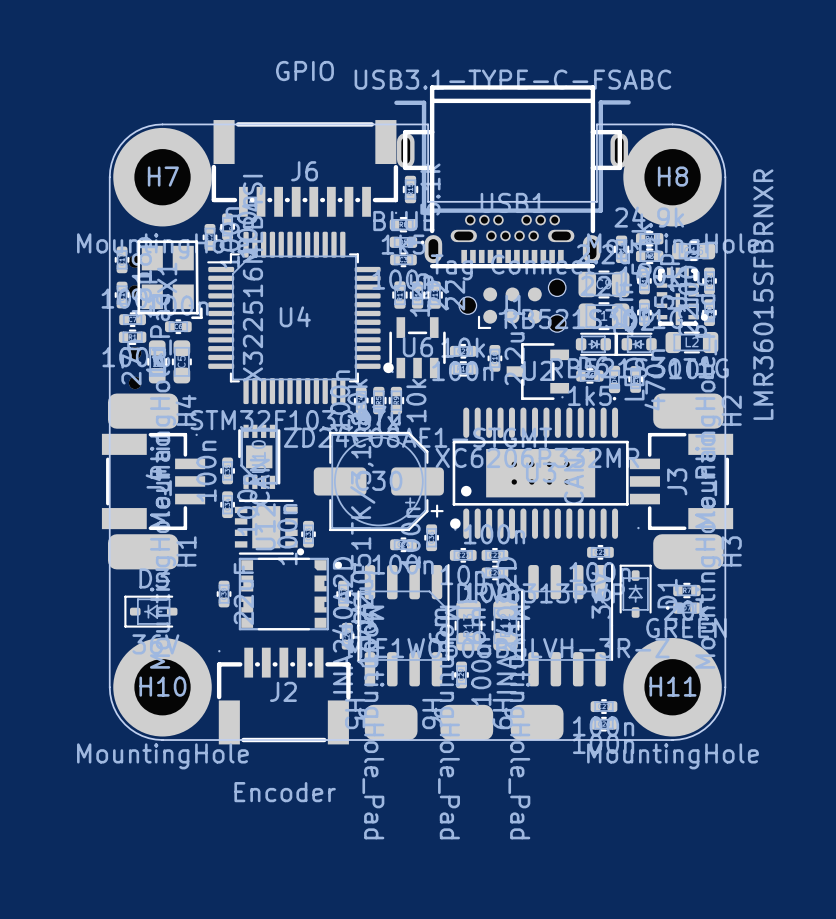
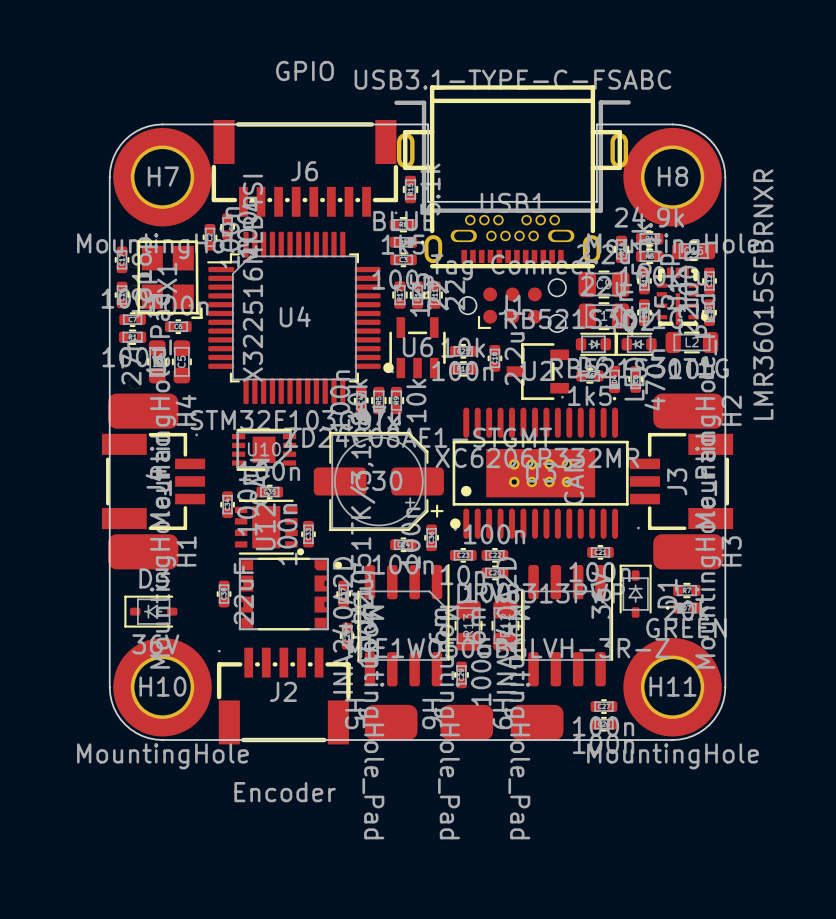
U10 rotation: 0° (259, 456) -> 90° counterclockwise (264, 449)
part rotation: 0° (227, 470) -> 90° clockwise (269, 492)
part position: (227, 470) -> (269, 492)

